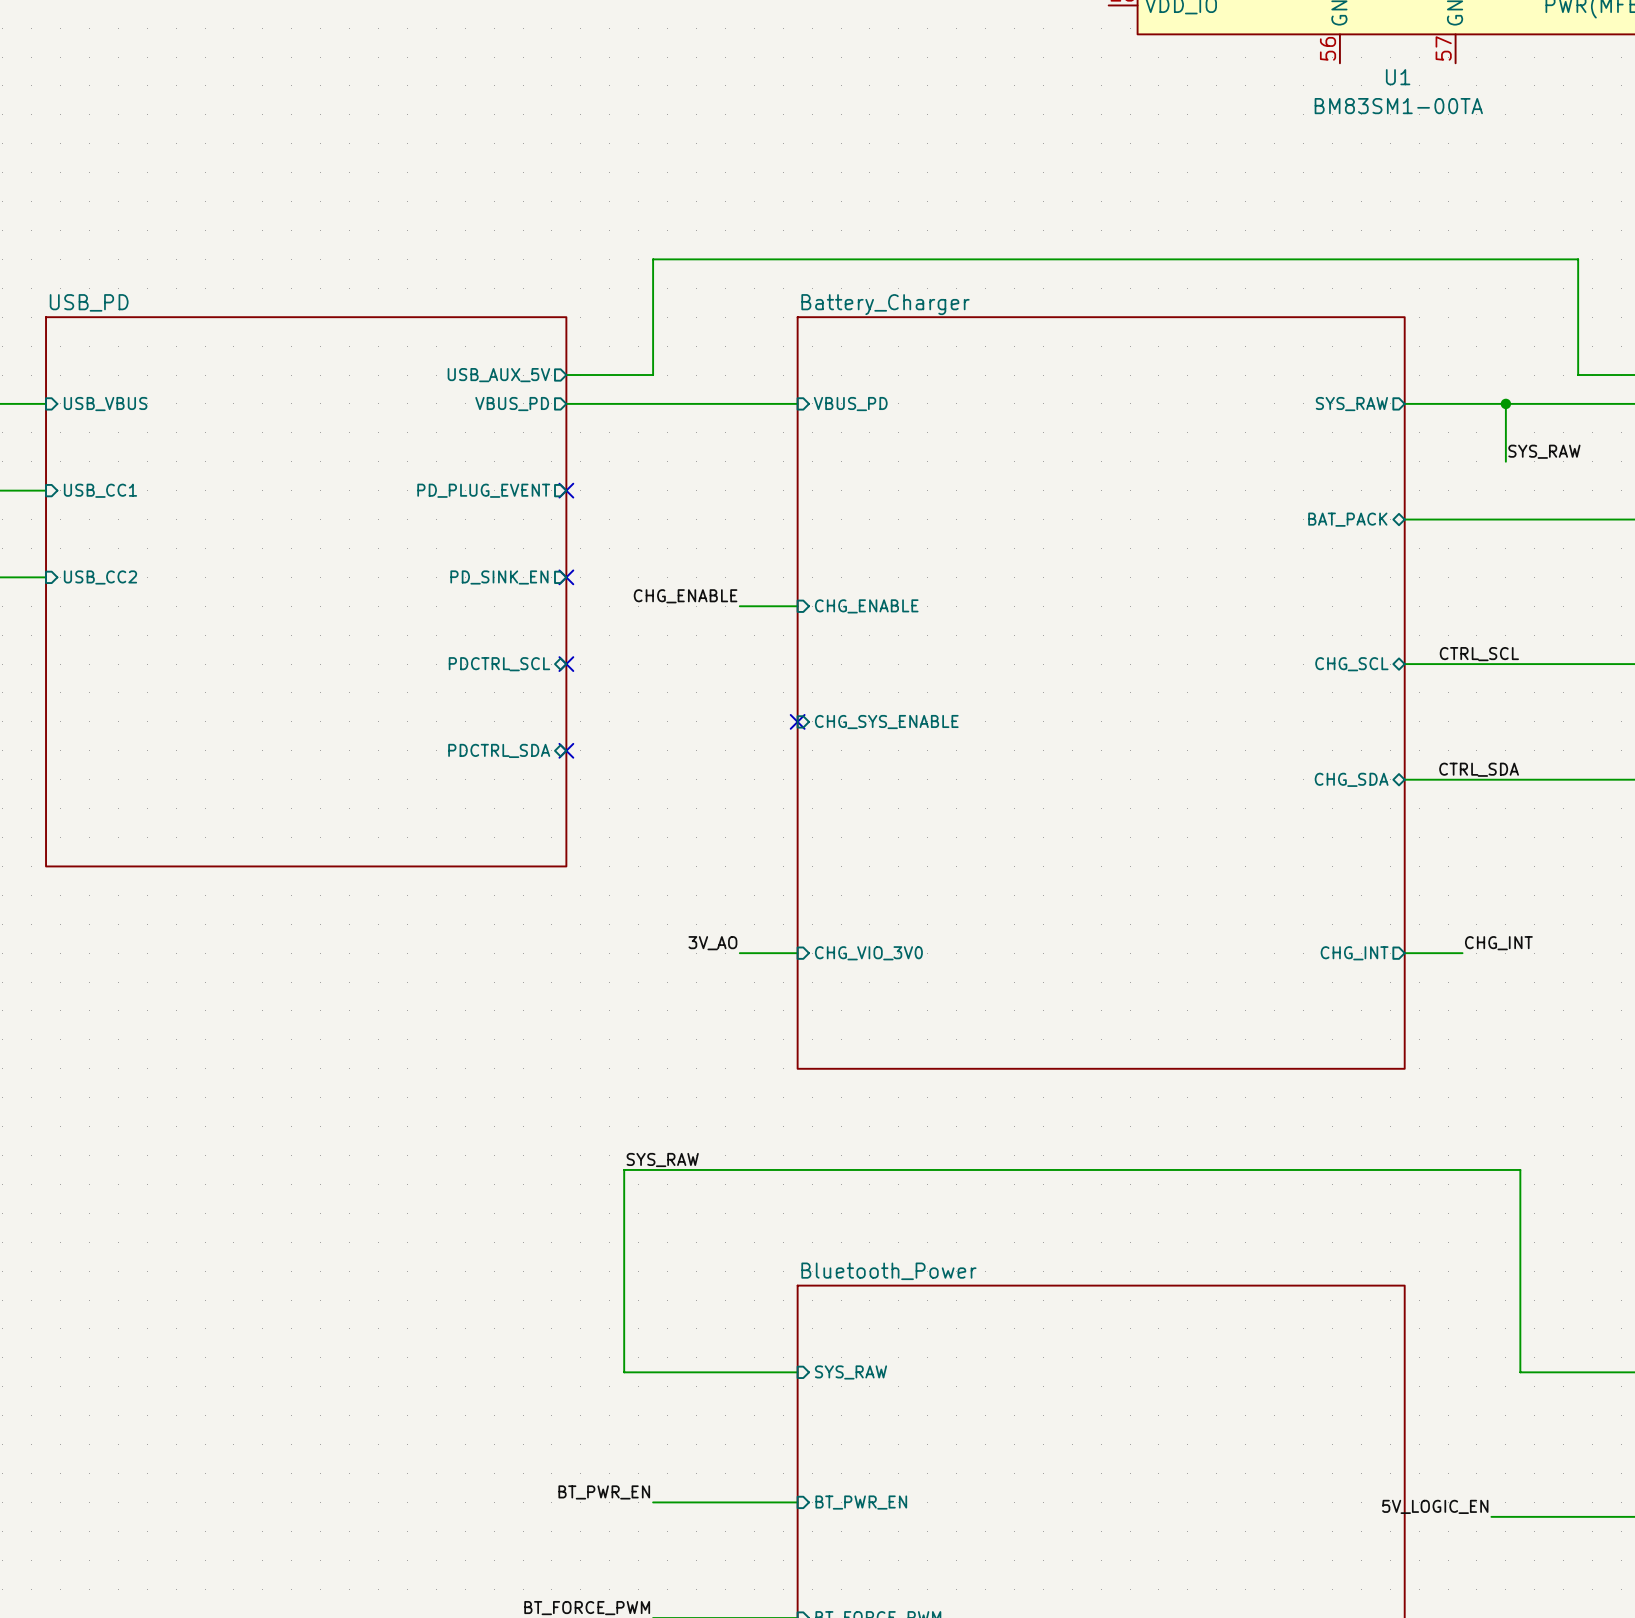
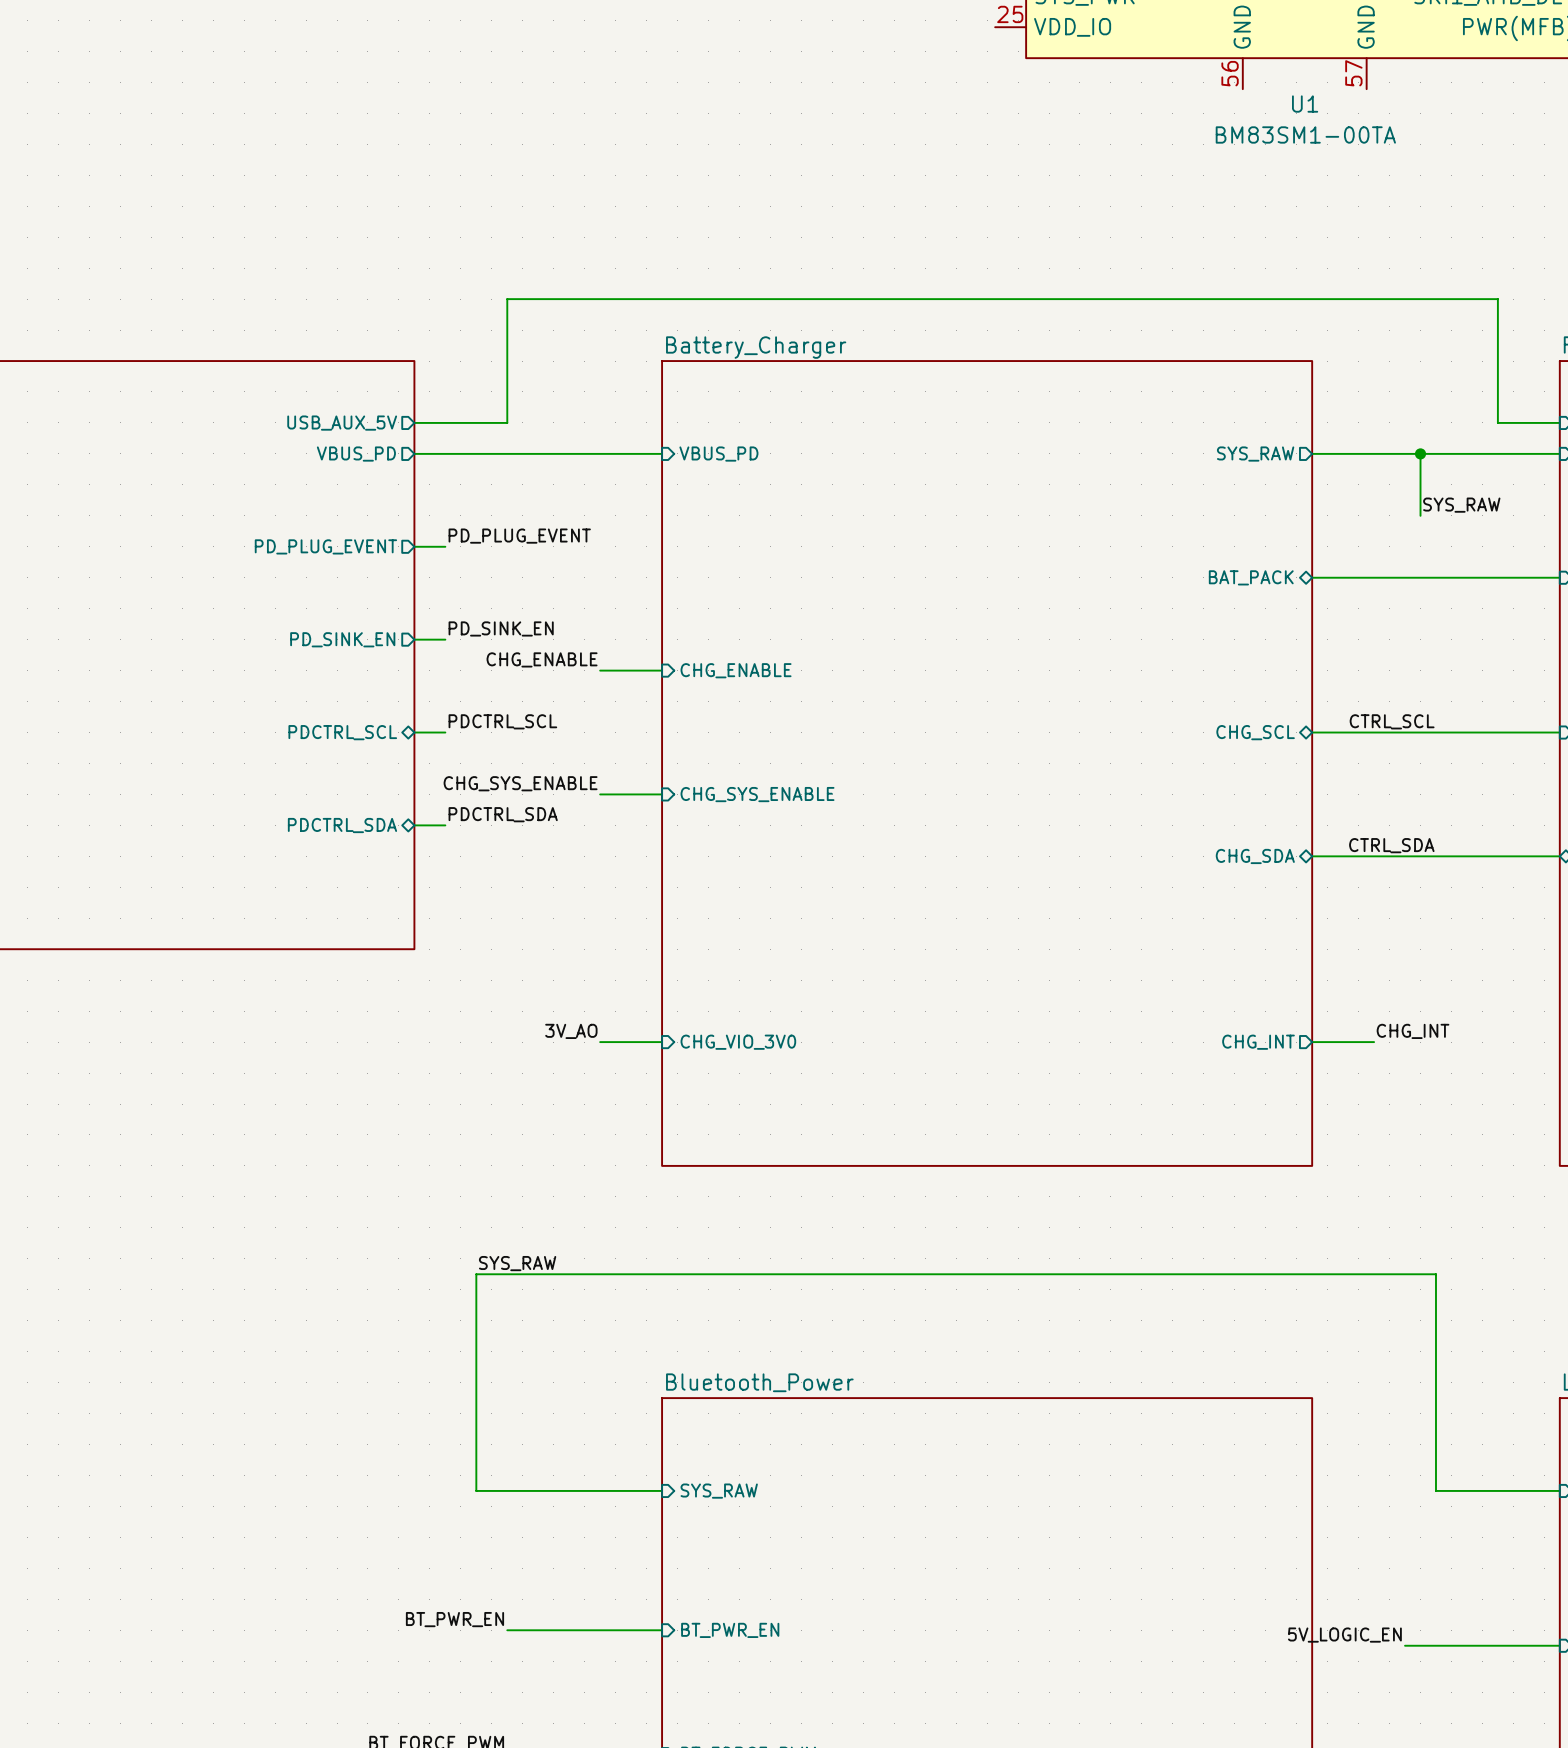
label: none -> PD_PLUG_EVENT (519, 536)
wire: none -> (414, 546) (445, 546)
no-connect mark: (566, 490) -> none
label: none -> PD_SINK_EN (501, 628)
wire: none -> (414, 639) (445, 639)
no-connect mark: (566, 577) -> none
label: none -> PDCTRL_SCL (502, 721)
wire: none -> (414, 732) (445, 732)
no-connect mark: (566, 664) -> none
label: none -> CHG_SYS_ENABLE (520, 783)
wire: none -> (600, 794) (662, 794)
no-connect mark: (797, 721) -> none
label: none -> PDCTRL_SDA (503, 814)
wire: none -> (414, 825) (445, 825)
no-connect mark: (566, 750) -> none

